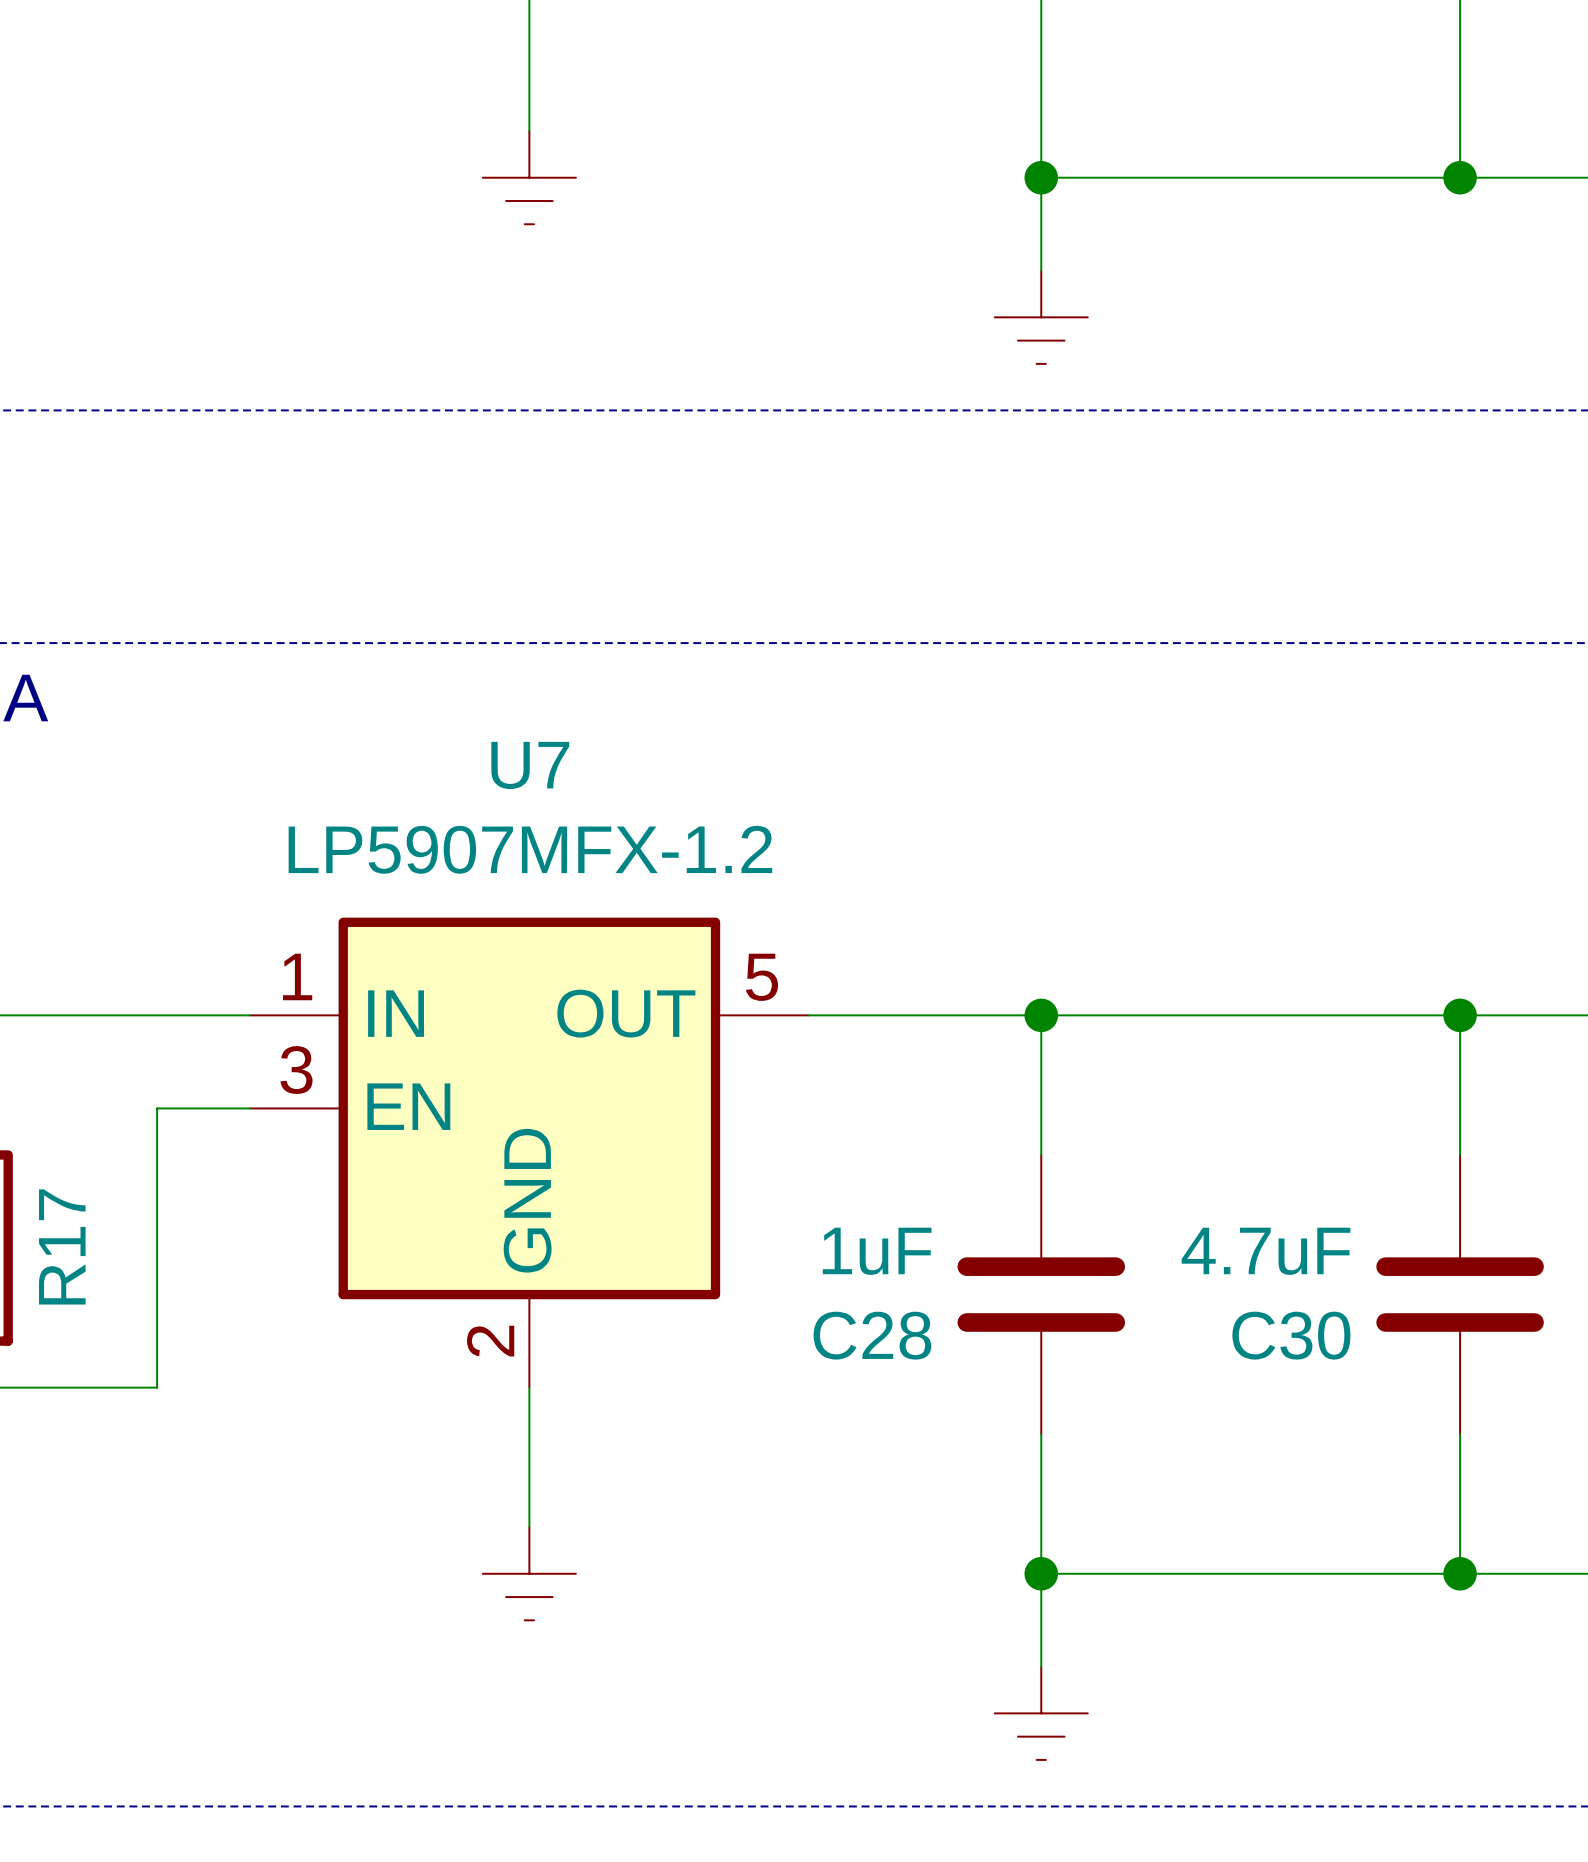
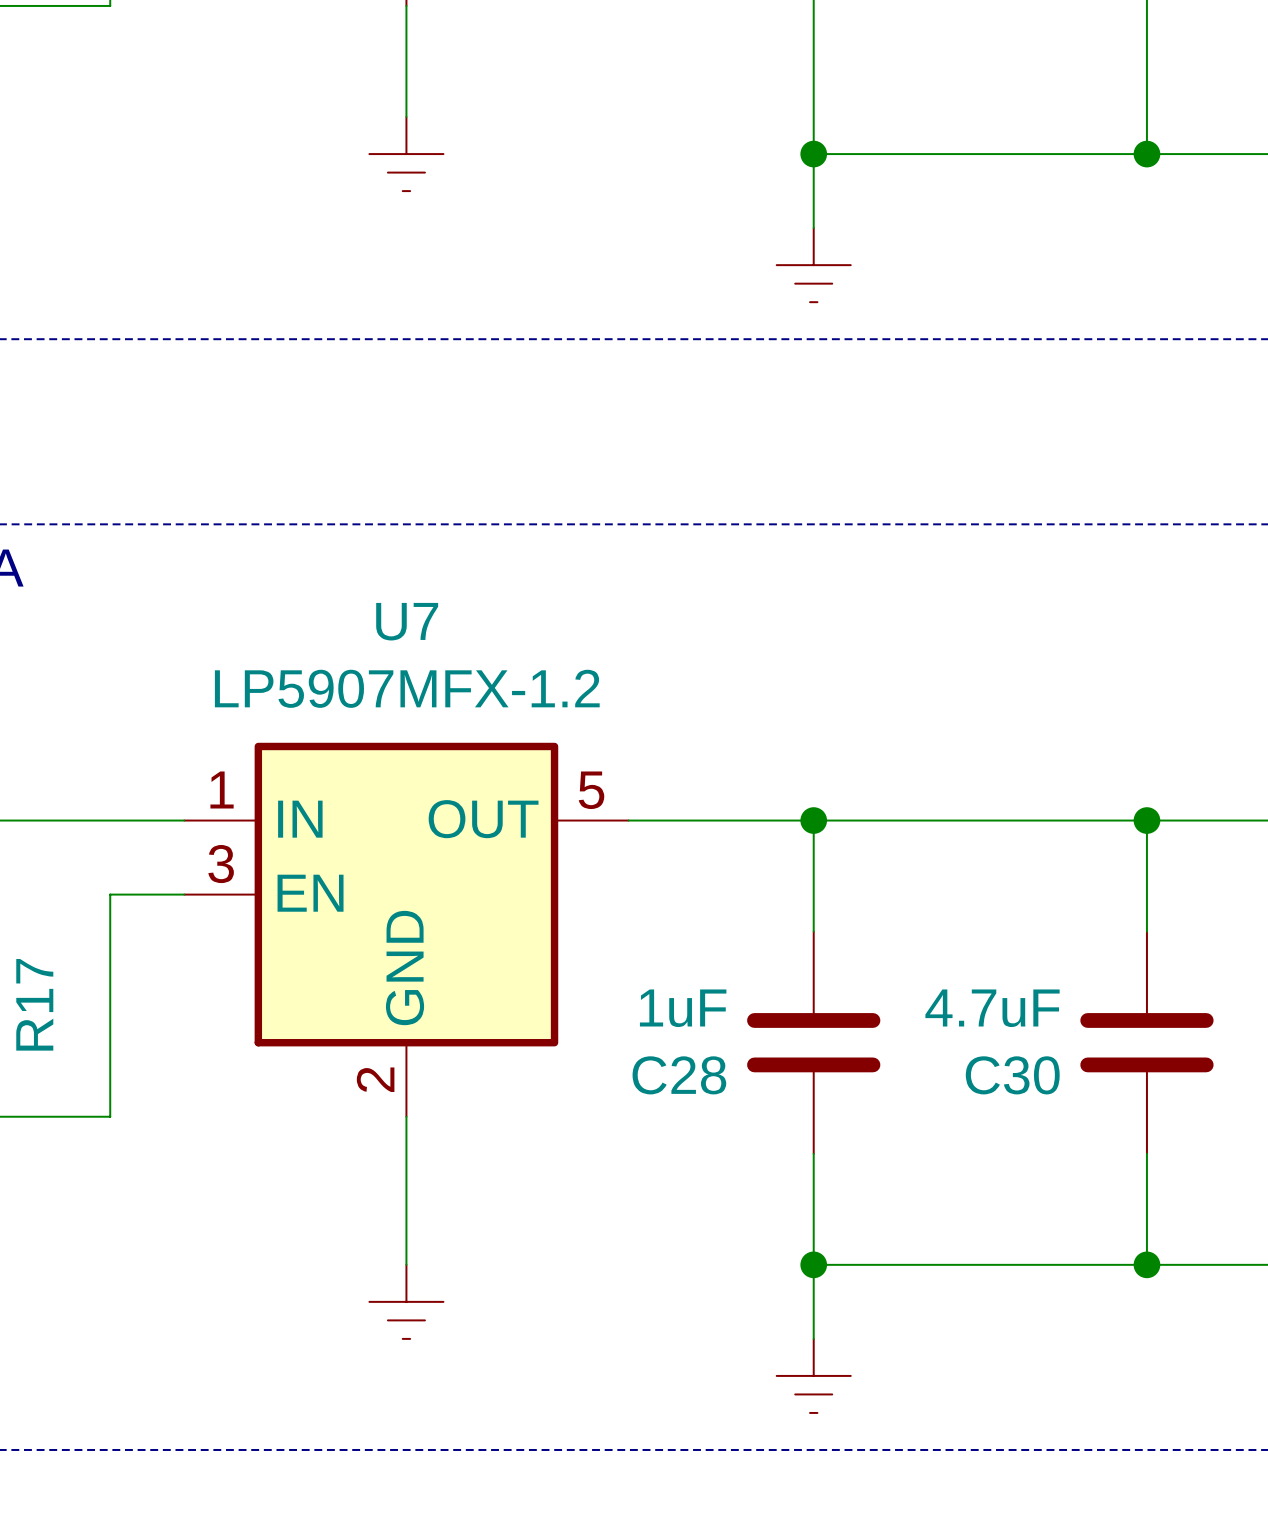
power symbol position: (529, 1573) -> (406, 1301)

